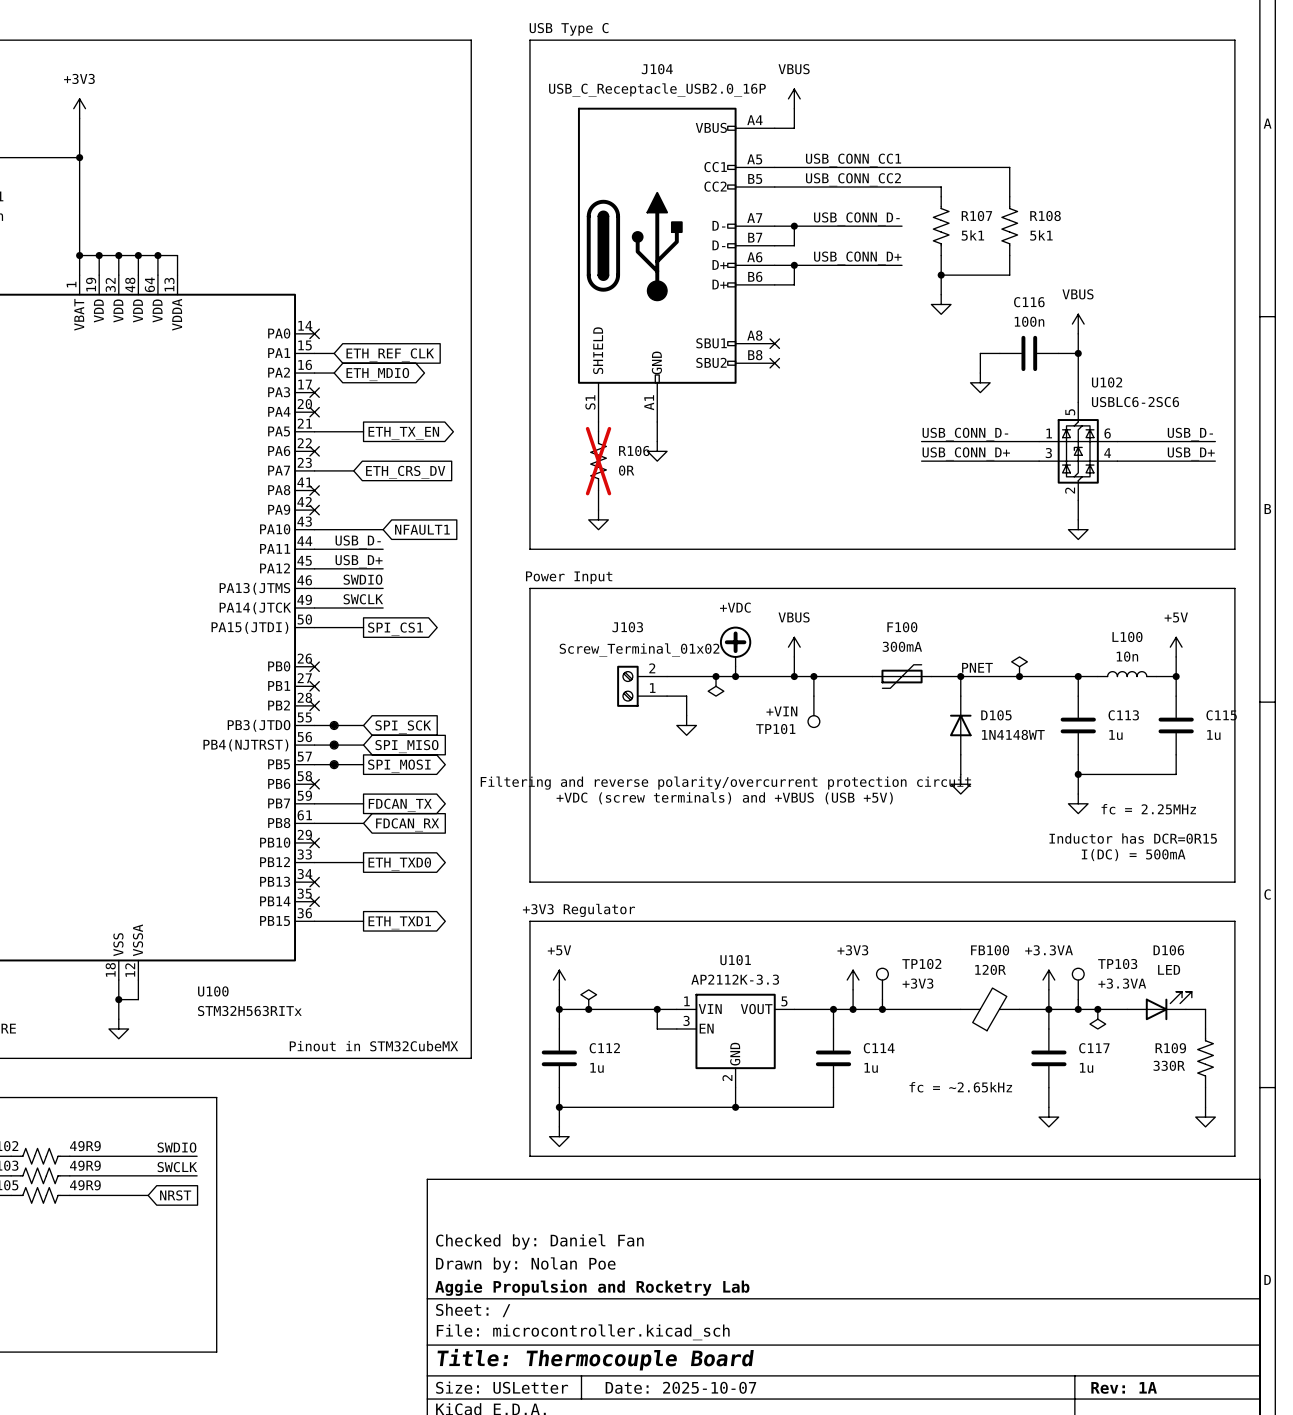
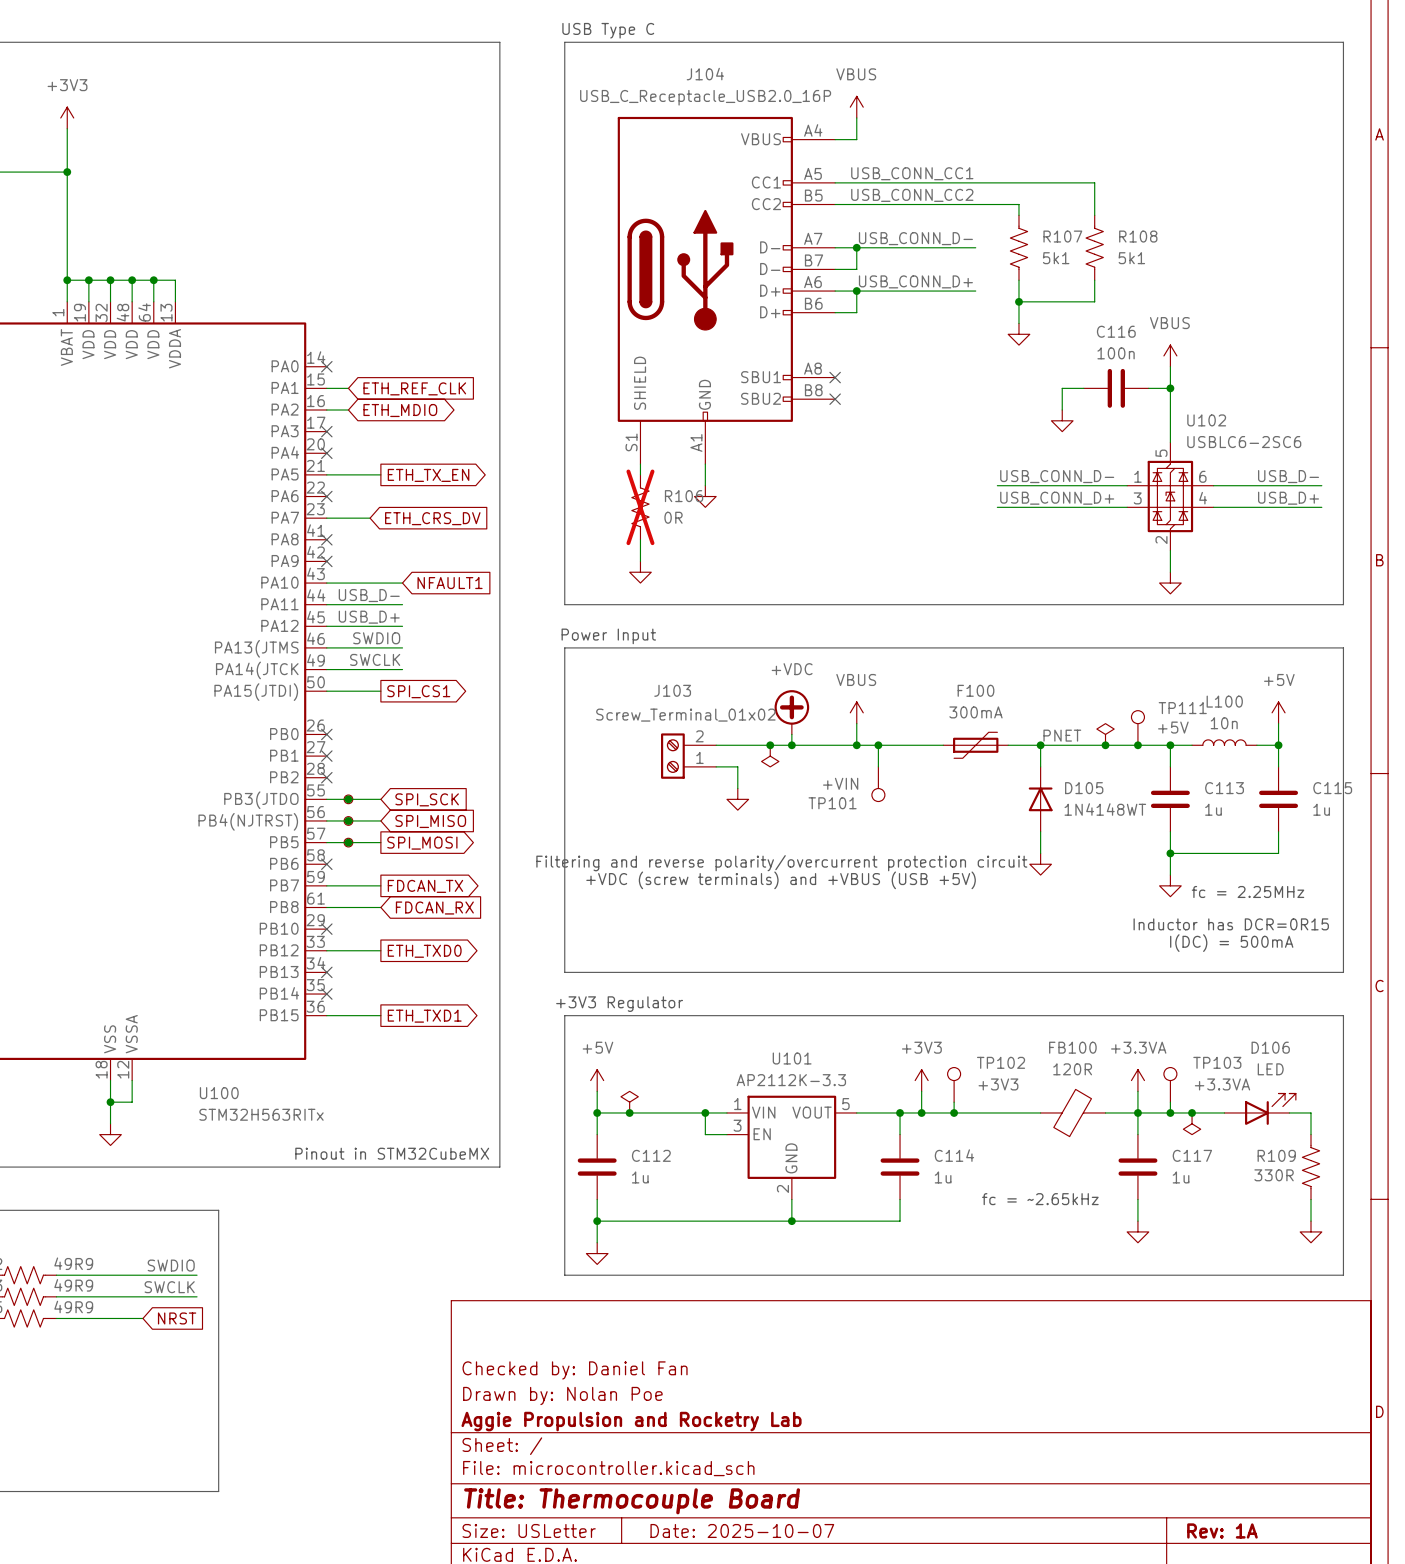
TP111: none -> +5V (1137, 727)
junction: none -> (1137, 745)

